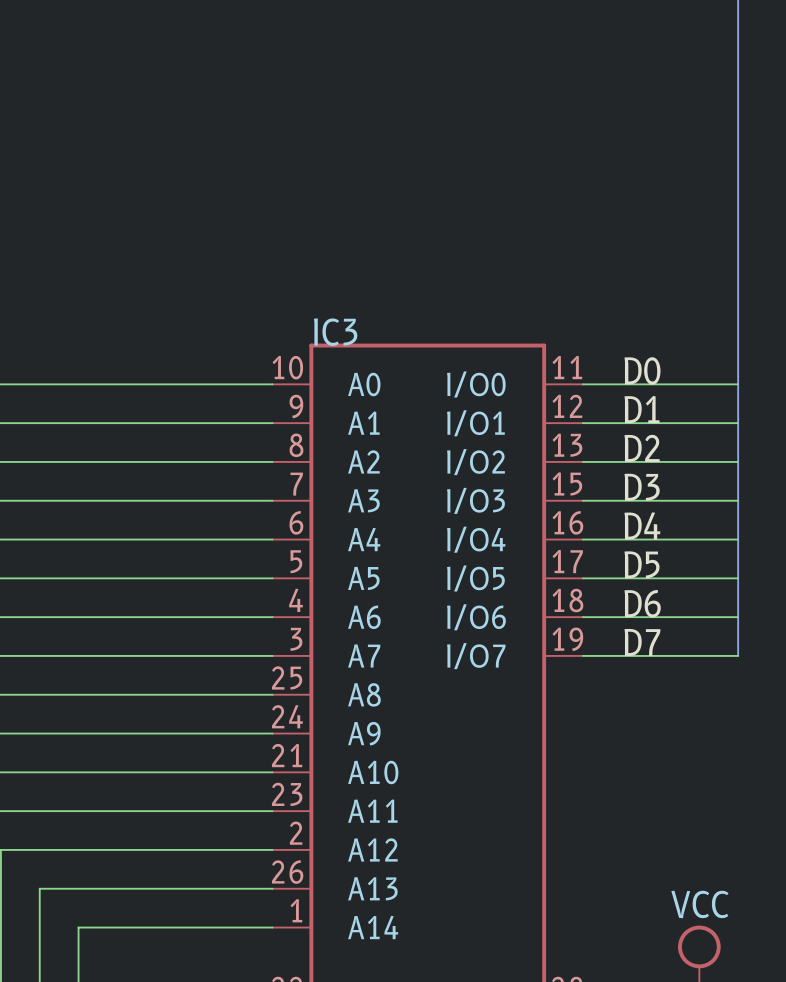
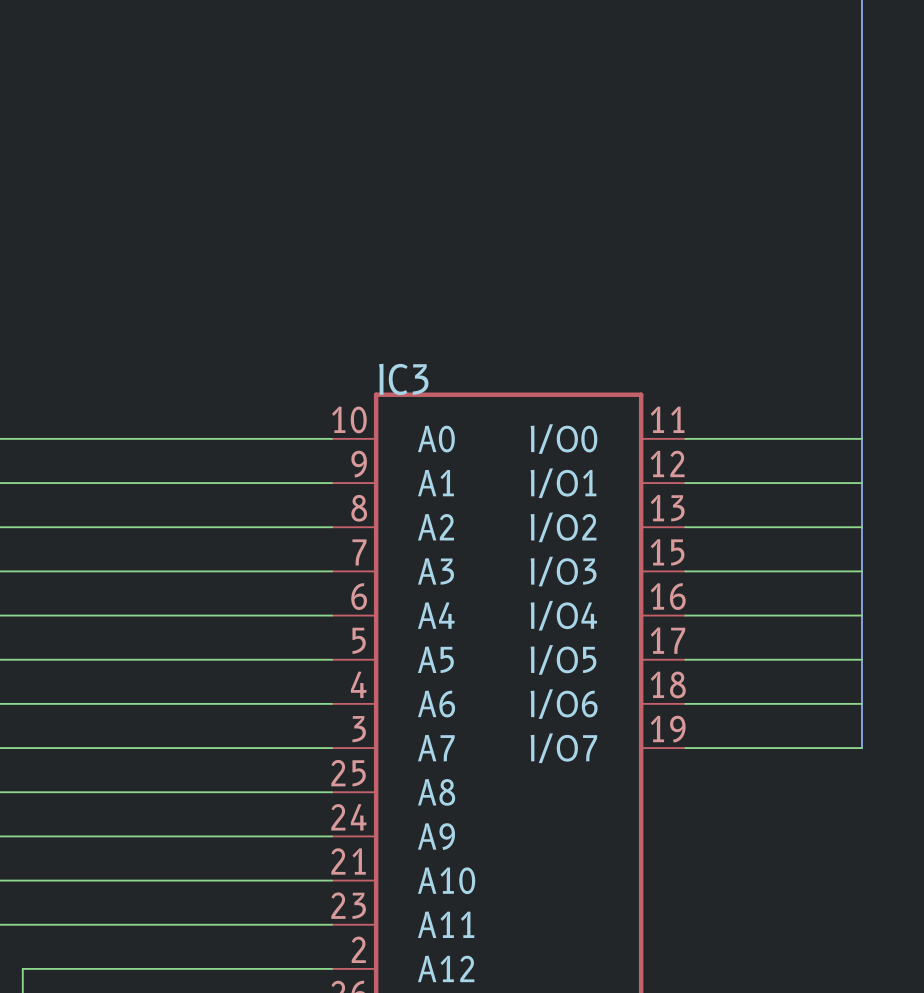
label: D0 (642, 370) -> none
label: D1 (642, 409) -> none
label: D2 (642, 448) -> none
label: D3 (642, 487) -> none
label: D4 (642, 525) -> none
label: D5 (642, 564) -> none
label: D6 (642, 603) -> none
label: D7 (642, 642) -> none

